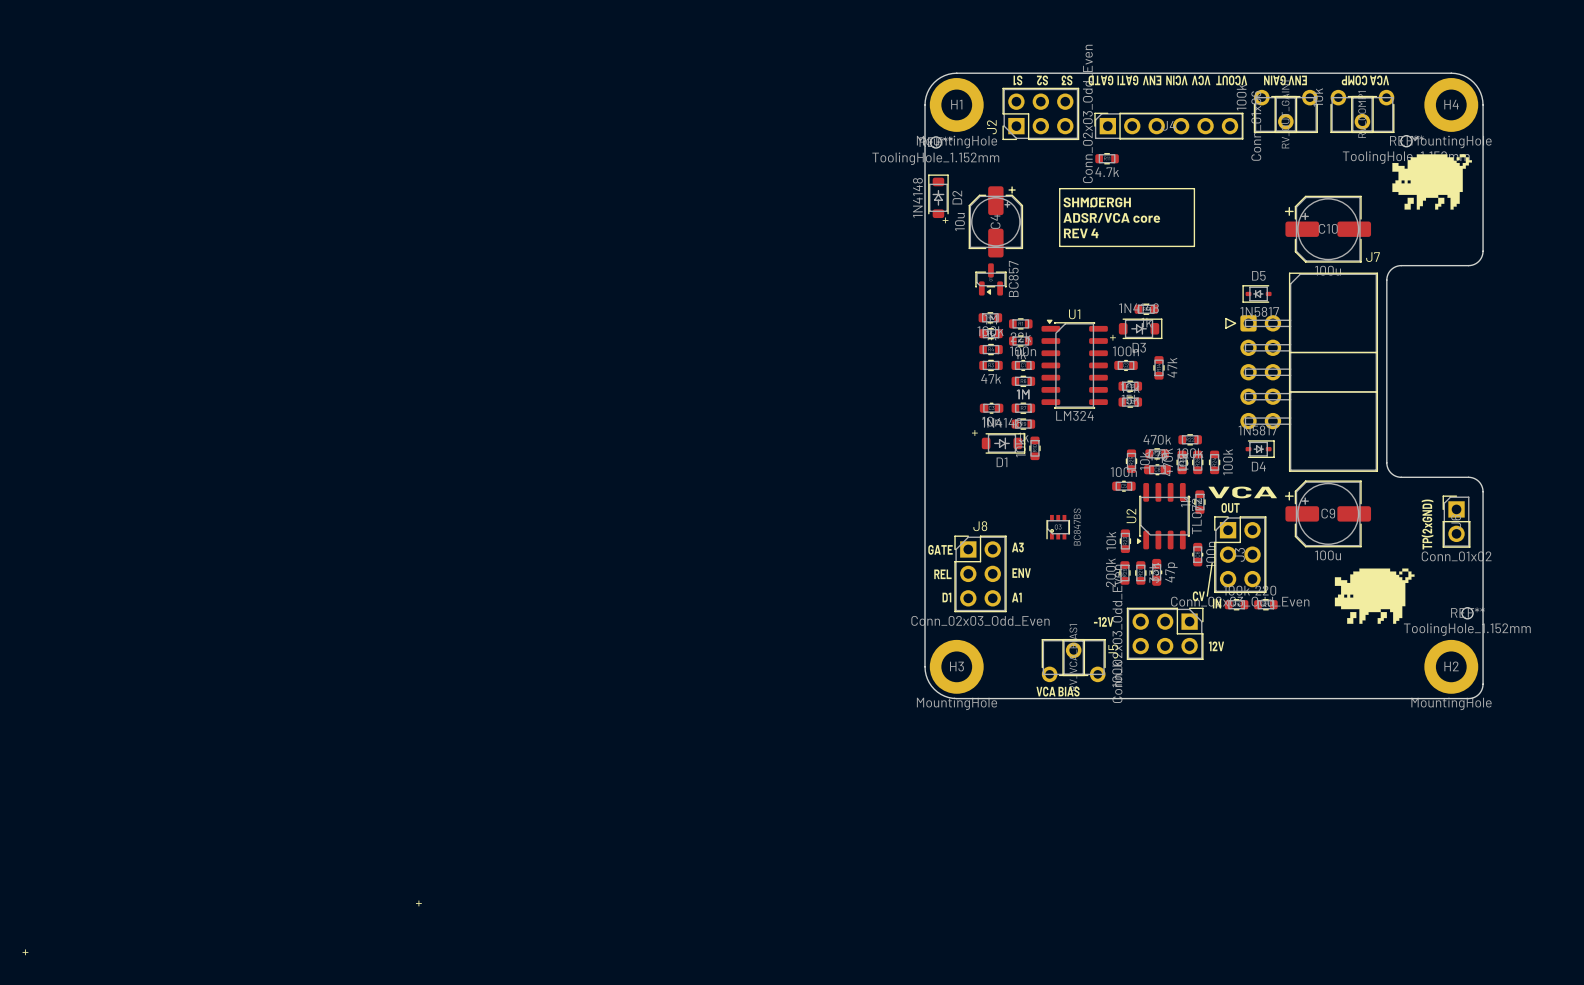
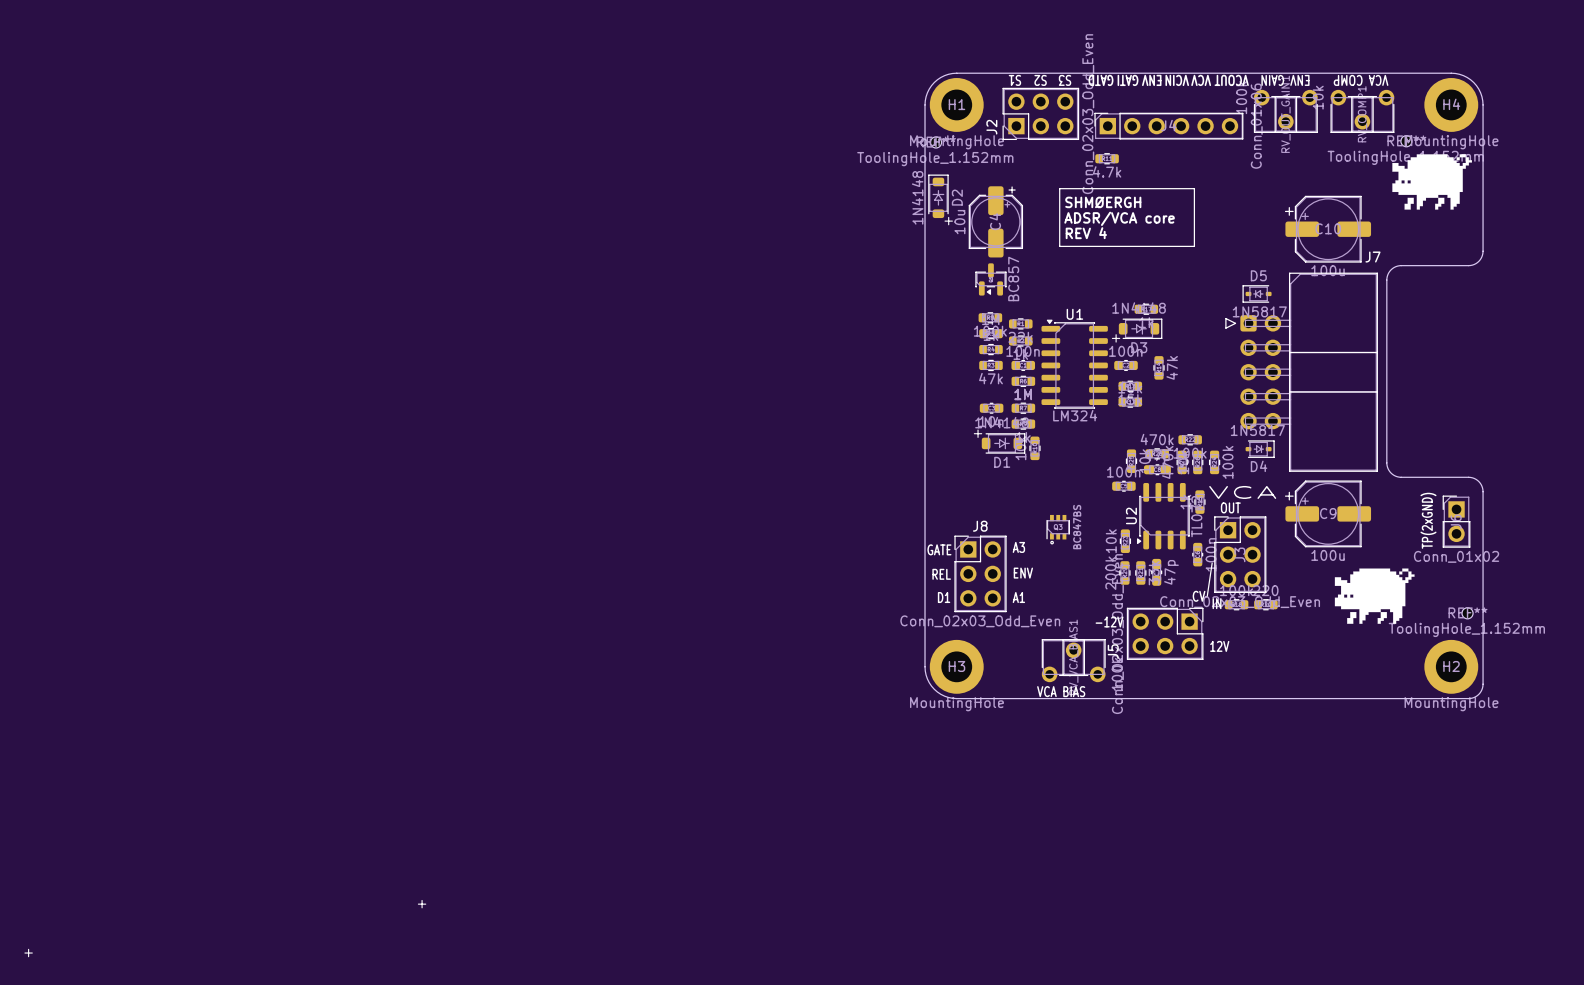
part footprint: [1046, 514, 1070, 540] -> [1046, 514, 1070, 545]

